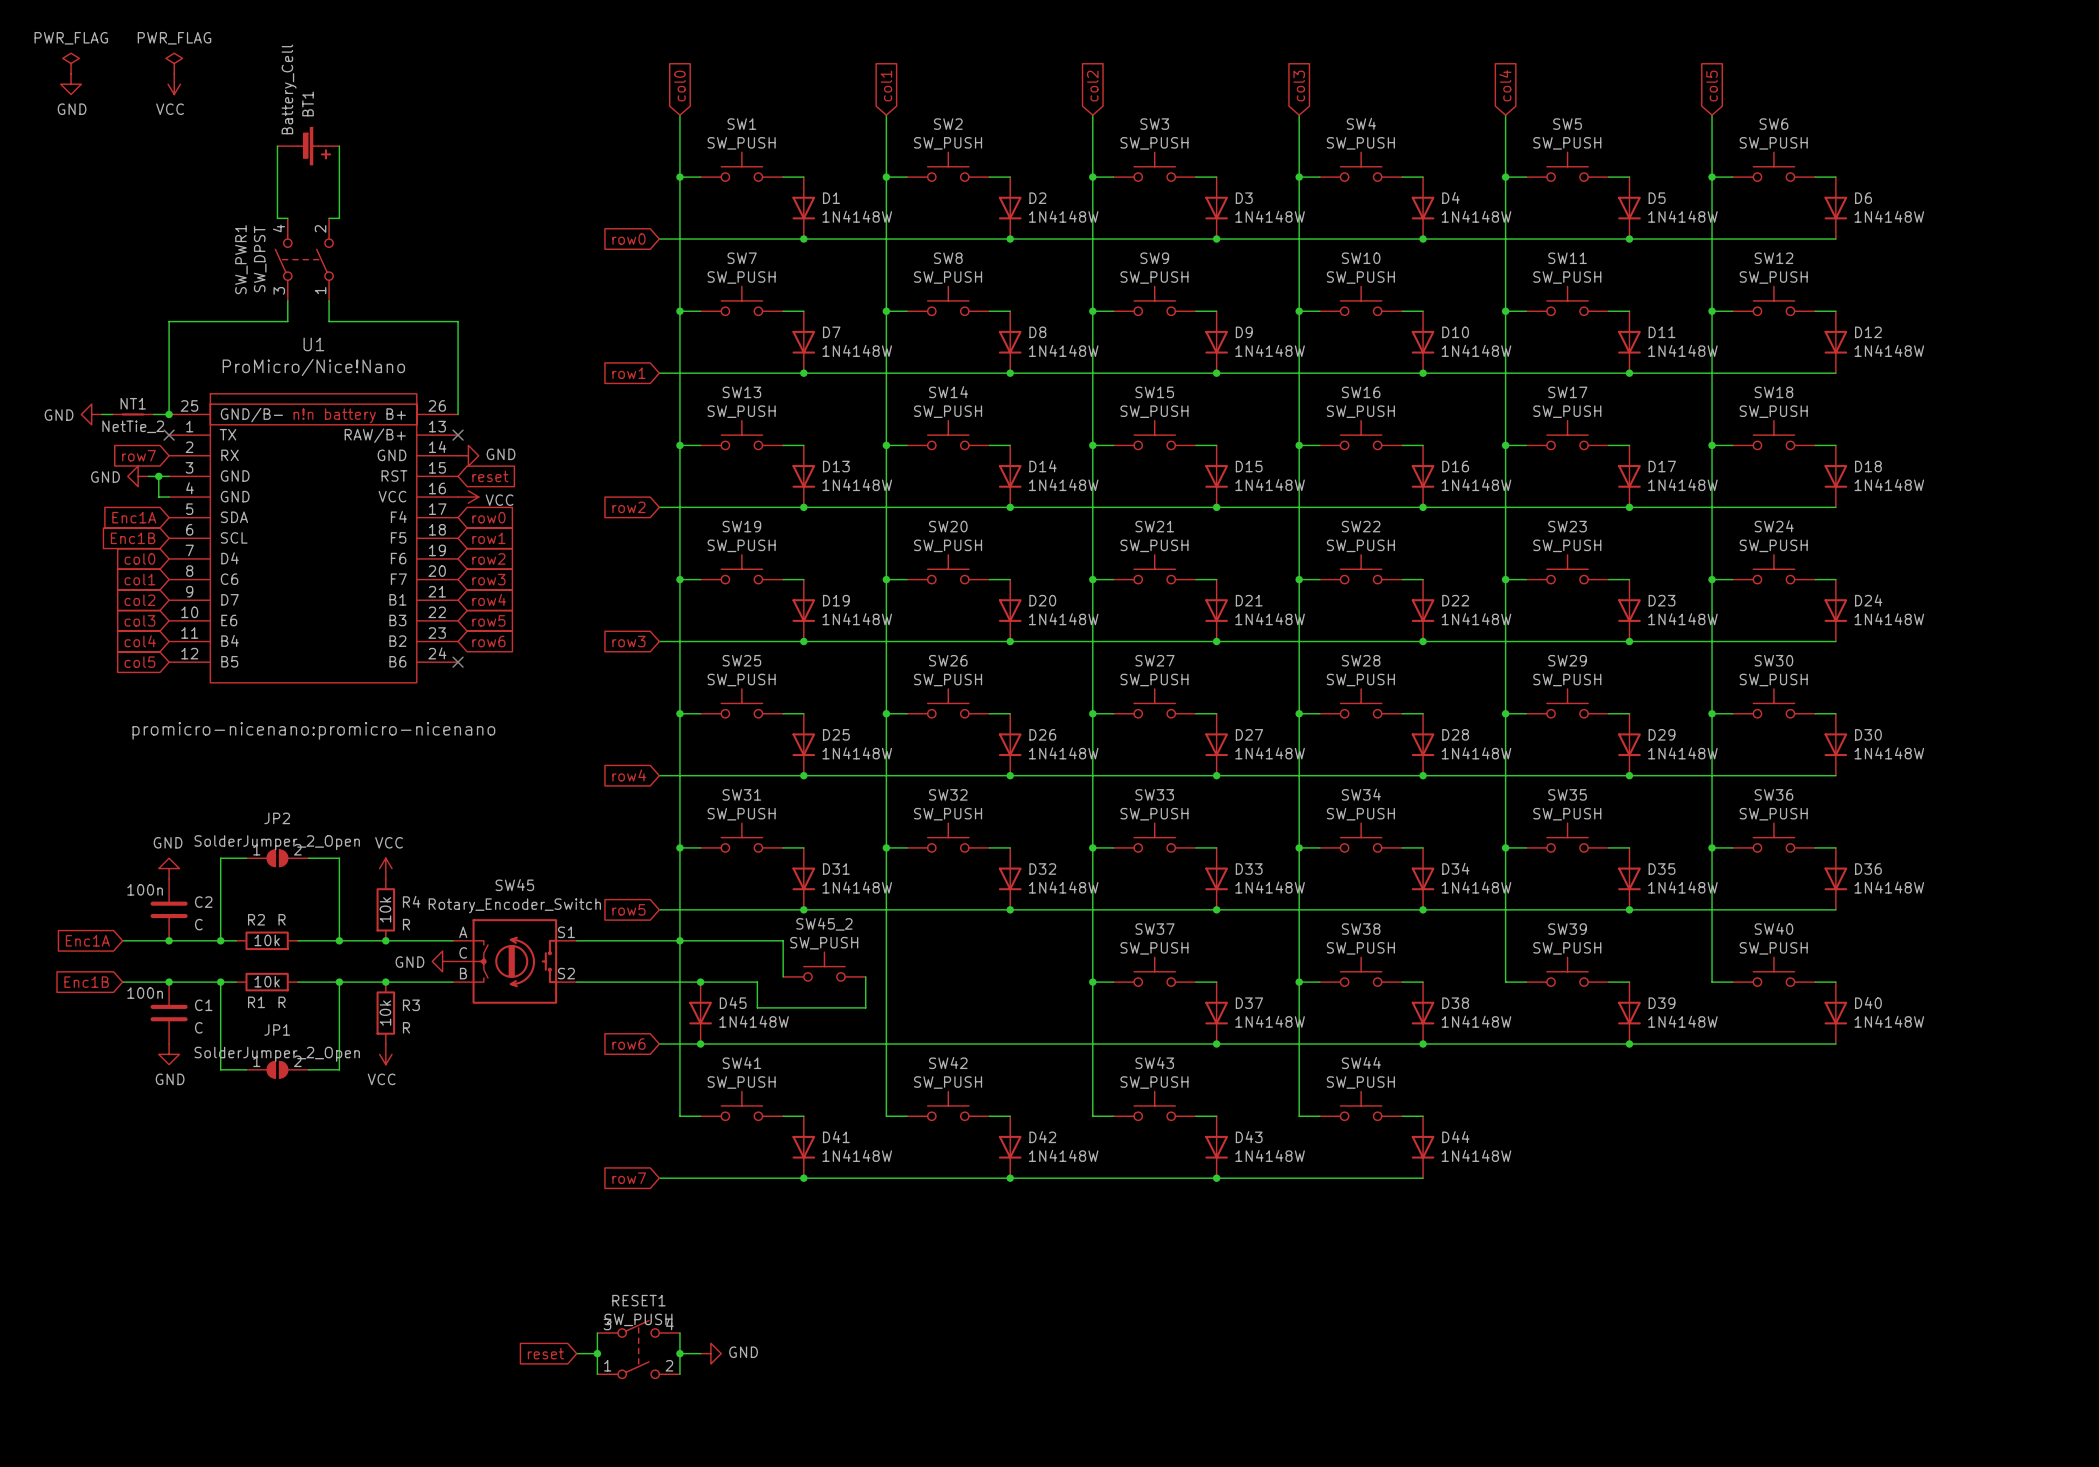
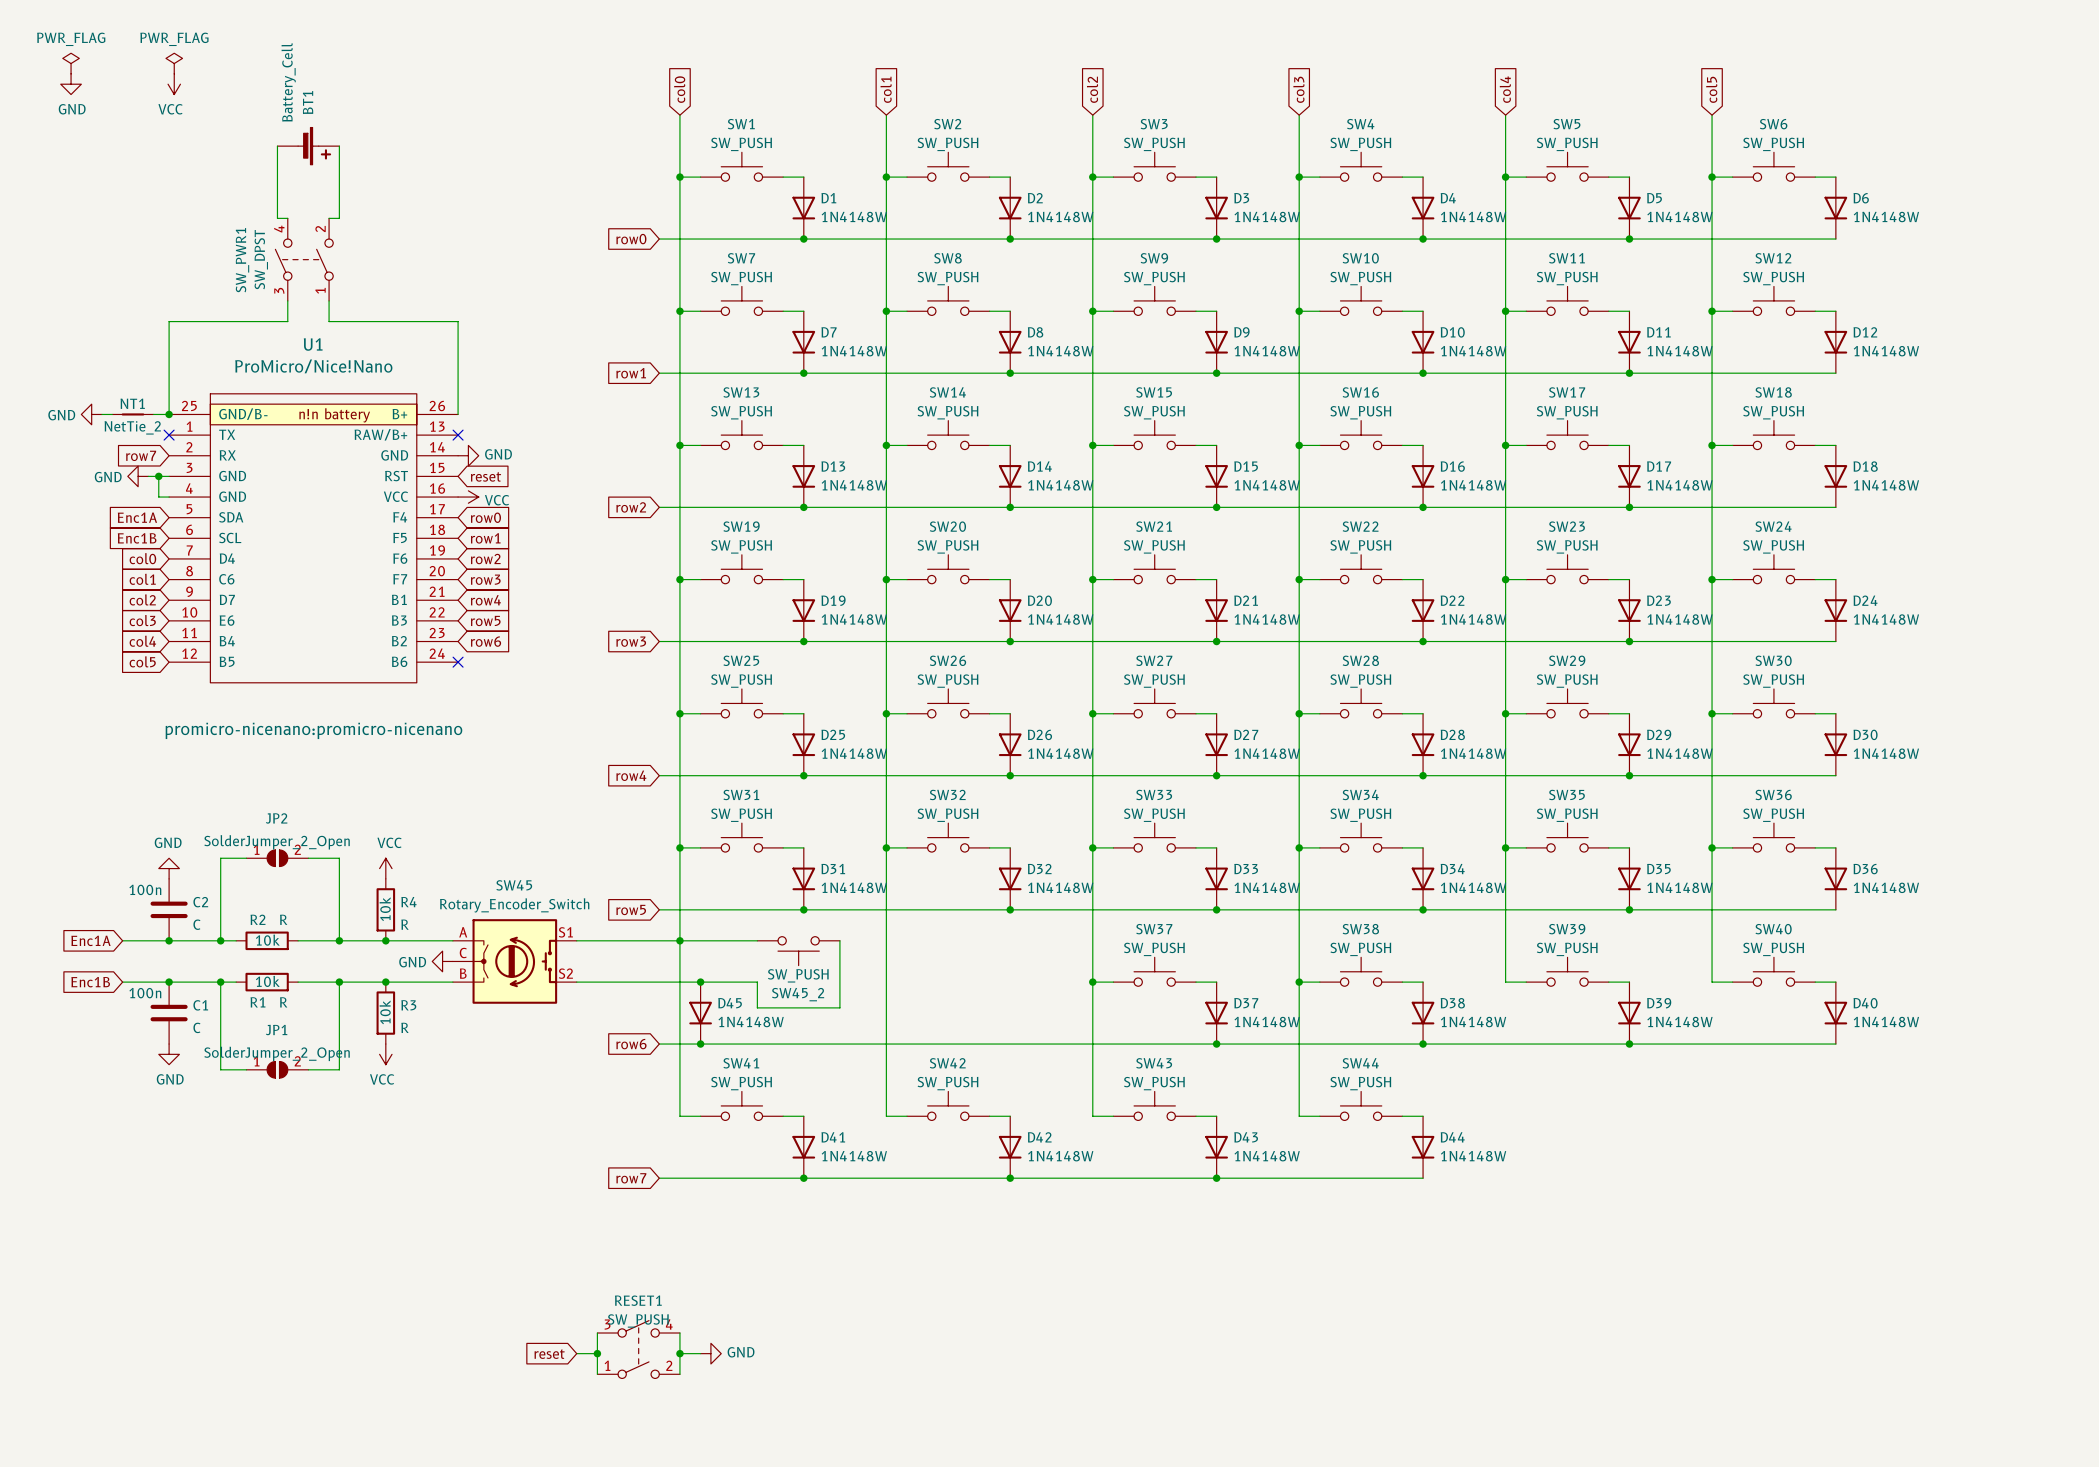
wire: (757, 940) (783, 940) (783, 976) -> none
SW45_2 rotation: 0° (824, 966) -> 180° (798, 951)
wire: (865, 976) (865, 1007) (839, 1007) -> (839, 940) (839, 1007)

